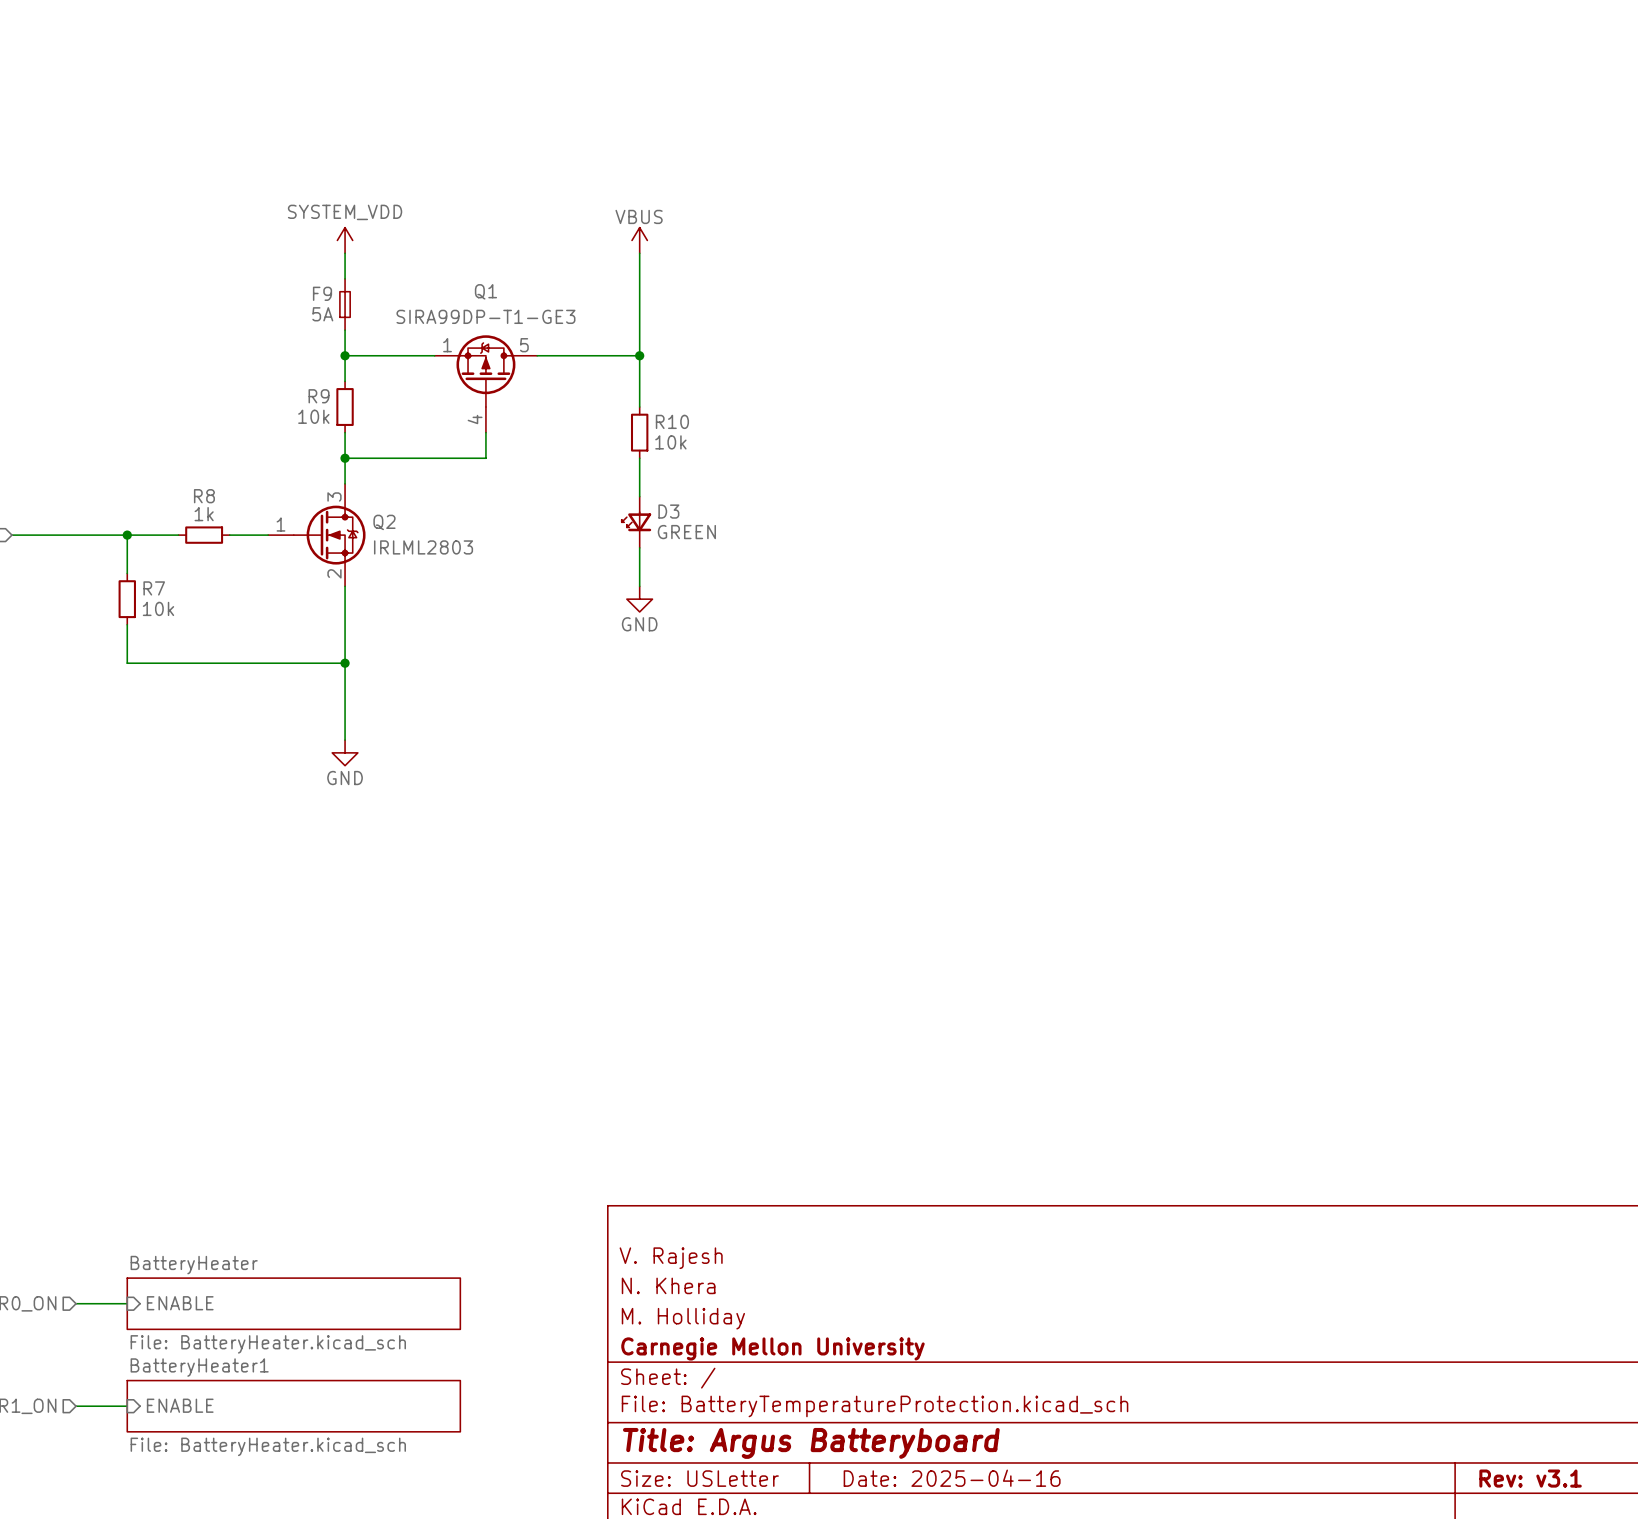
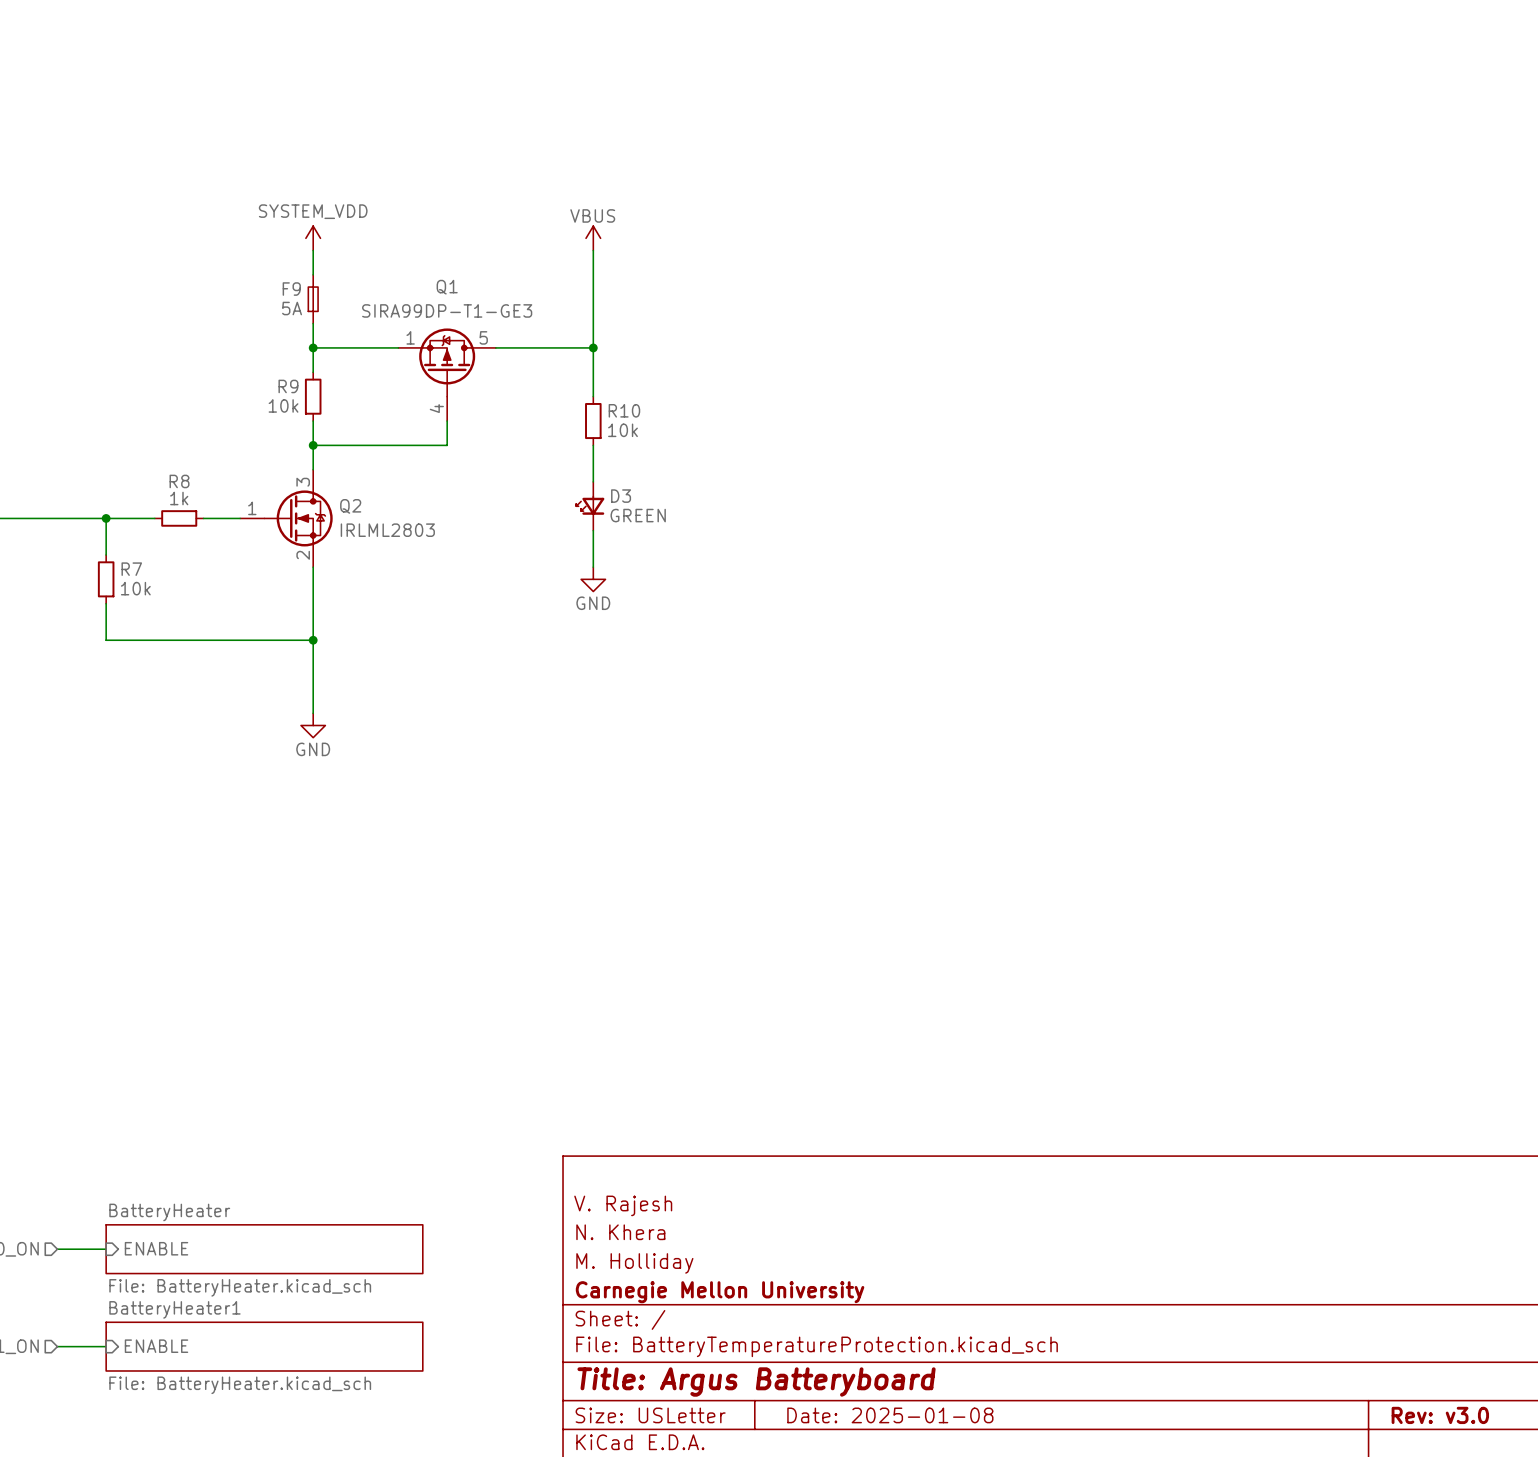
title block: Date: 2025-04-16 (952, 1478) -> Date: 2025-01-08 (890, 1415)
title block: Rev: v3.1 (1530, 1478) -> Rev: v3.0 (1440, 1415)

